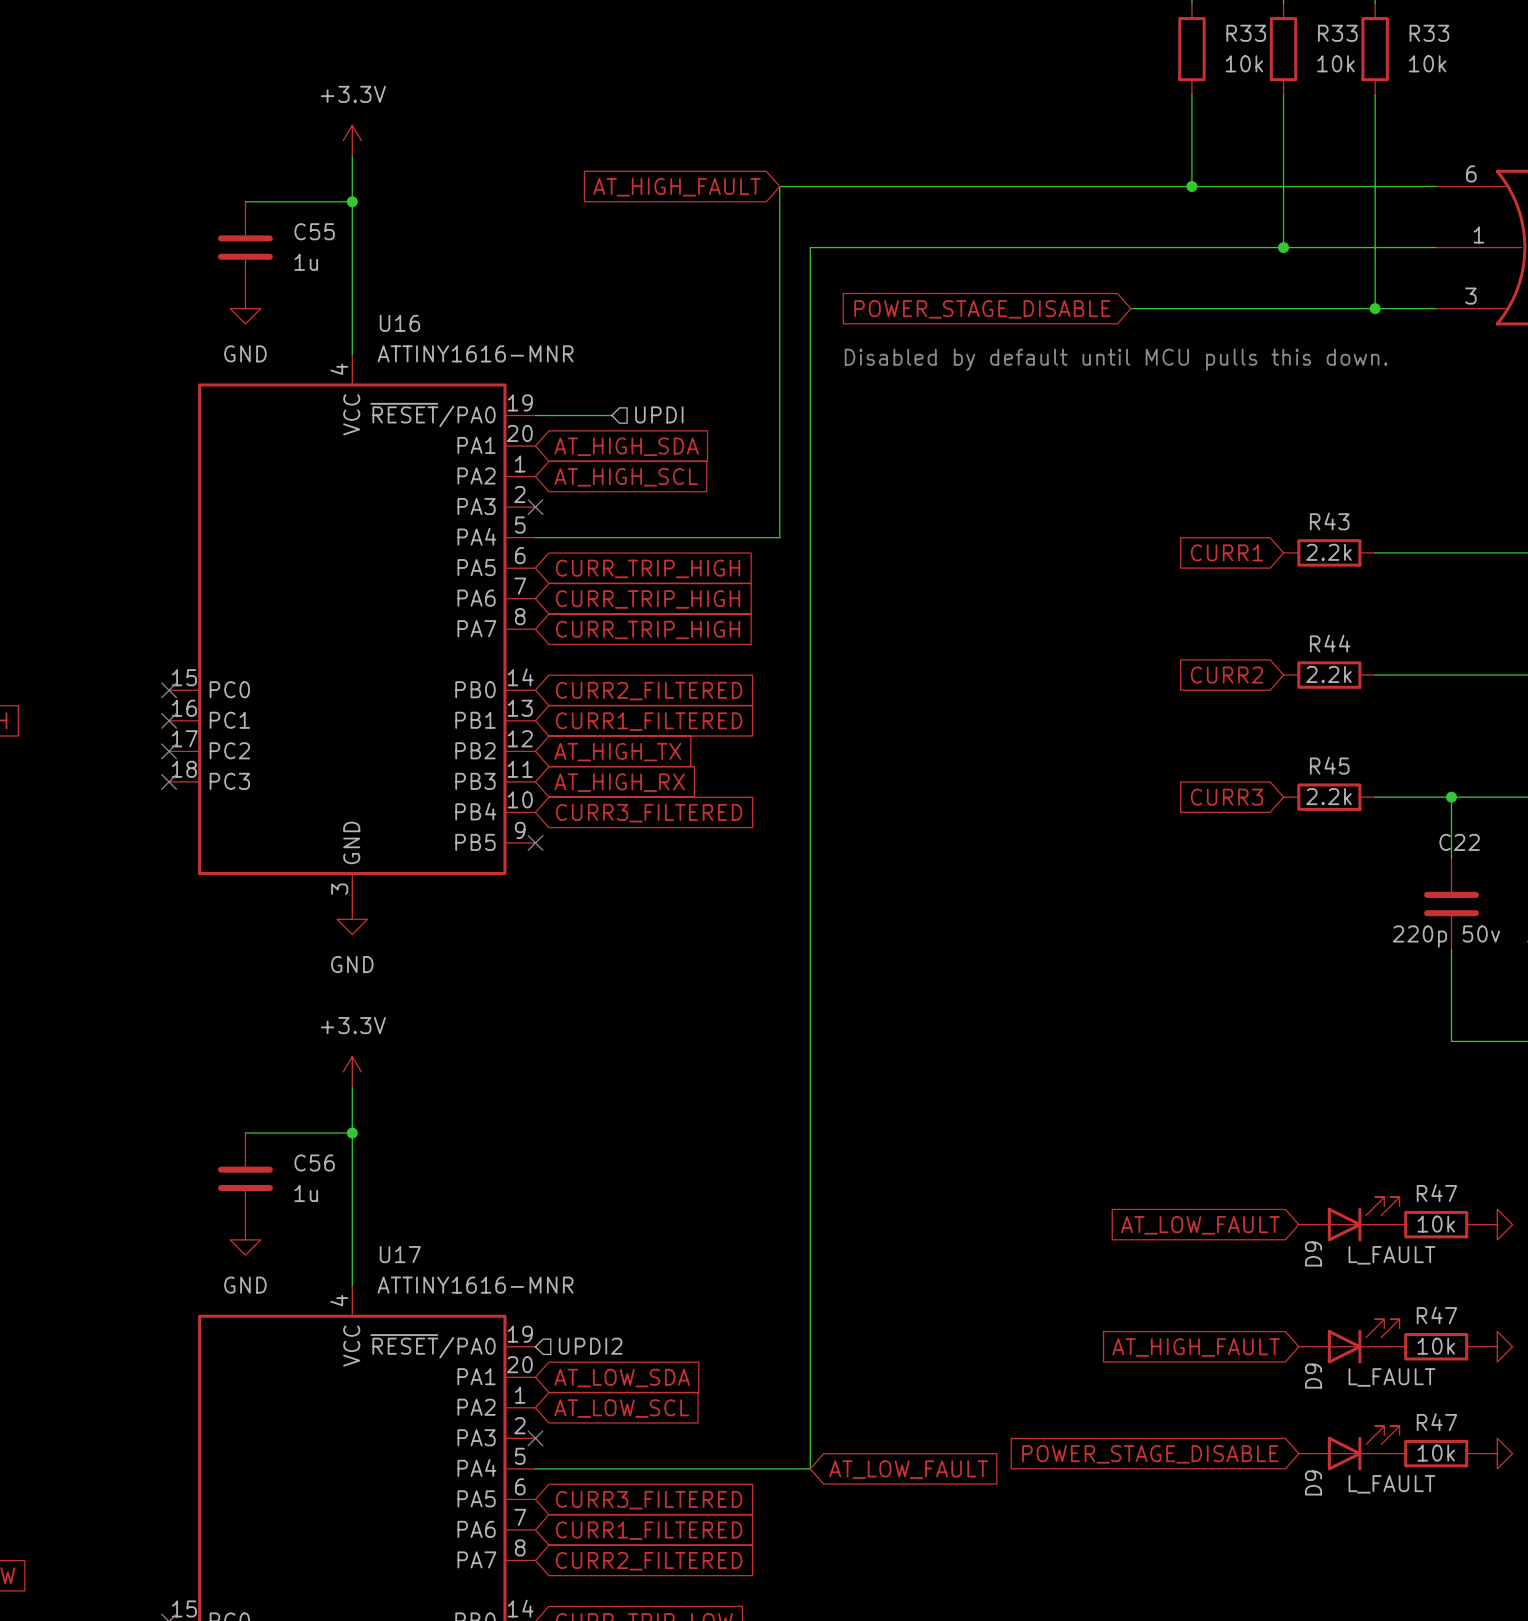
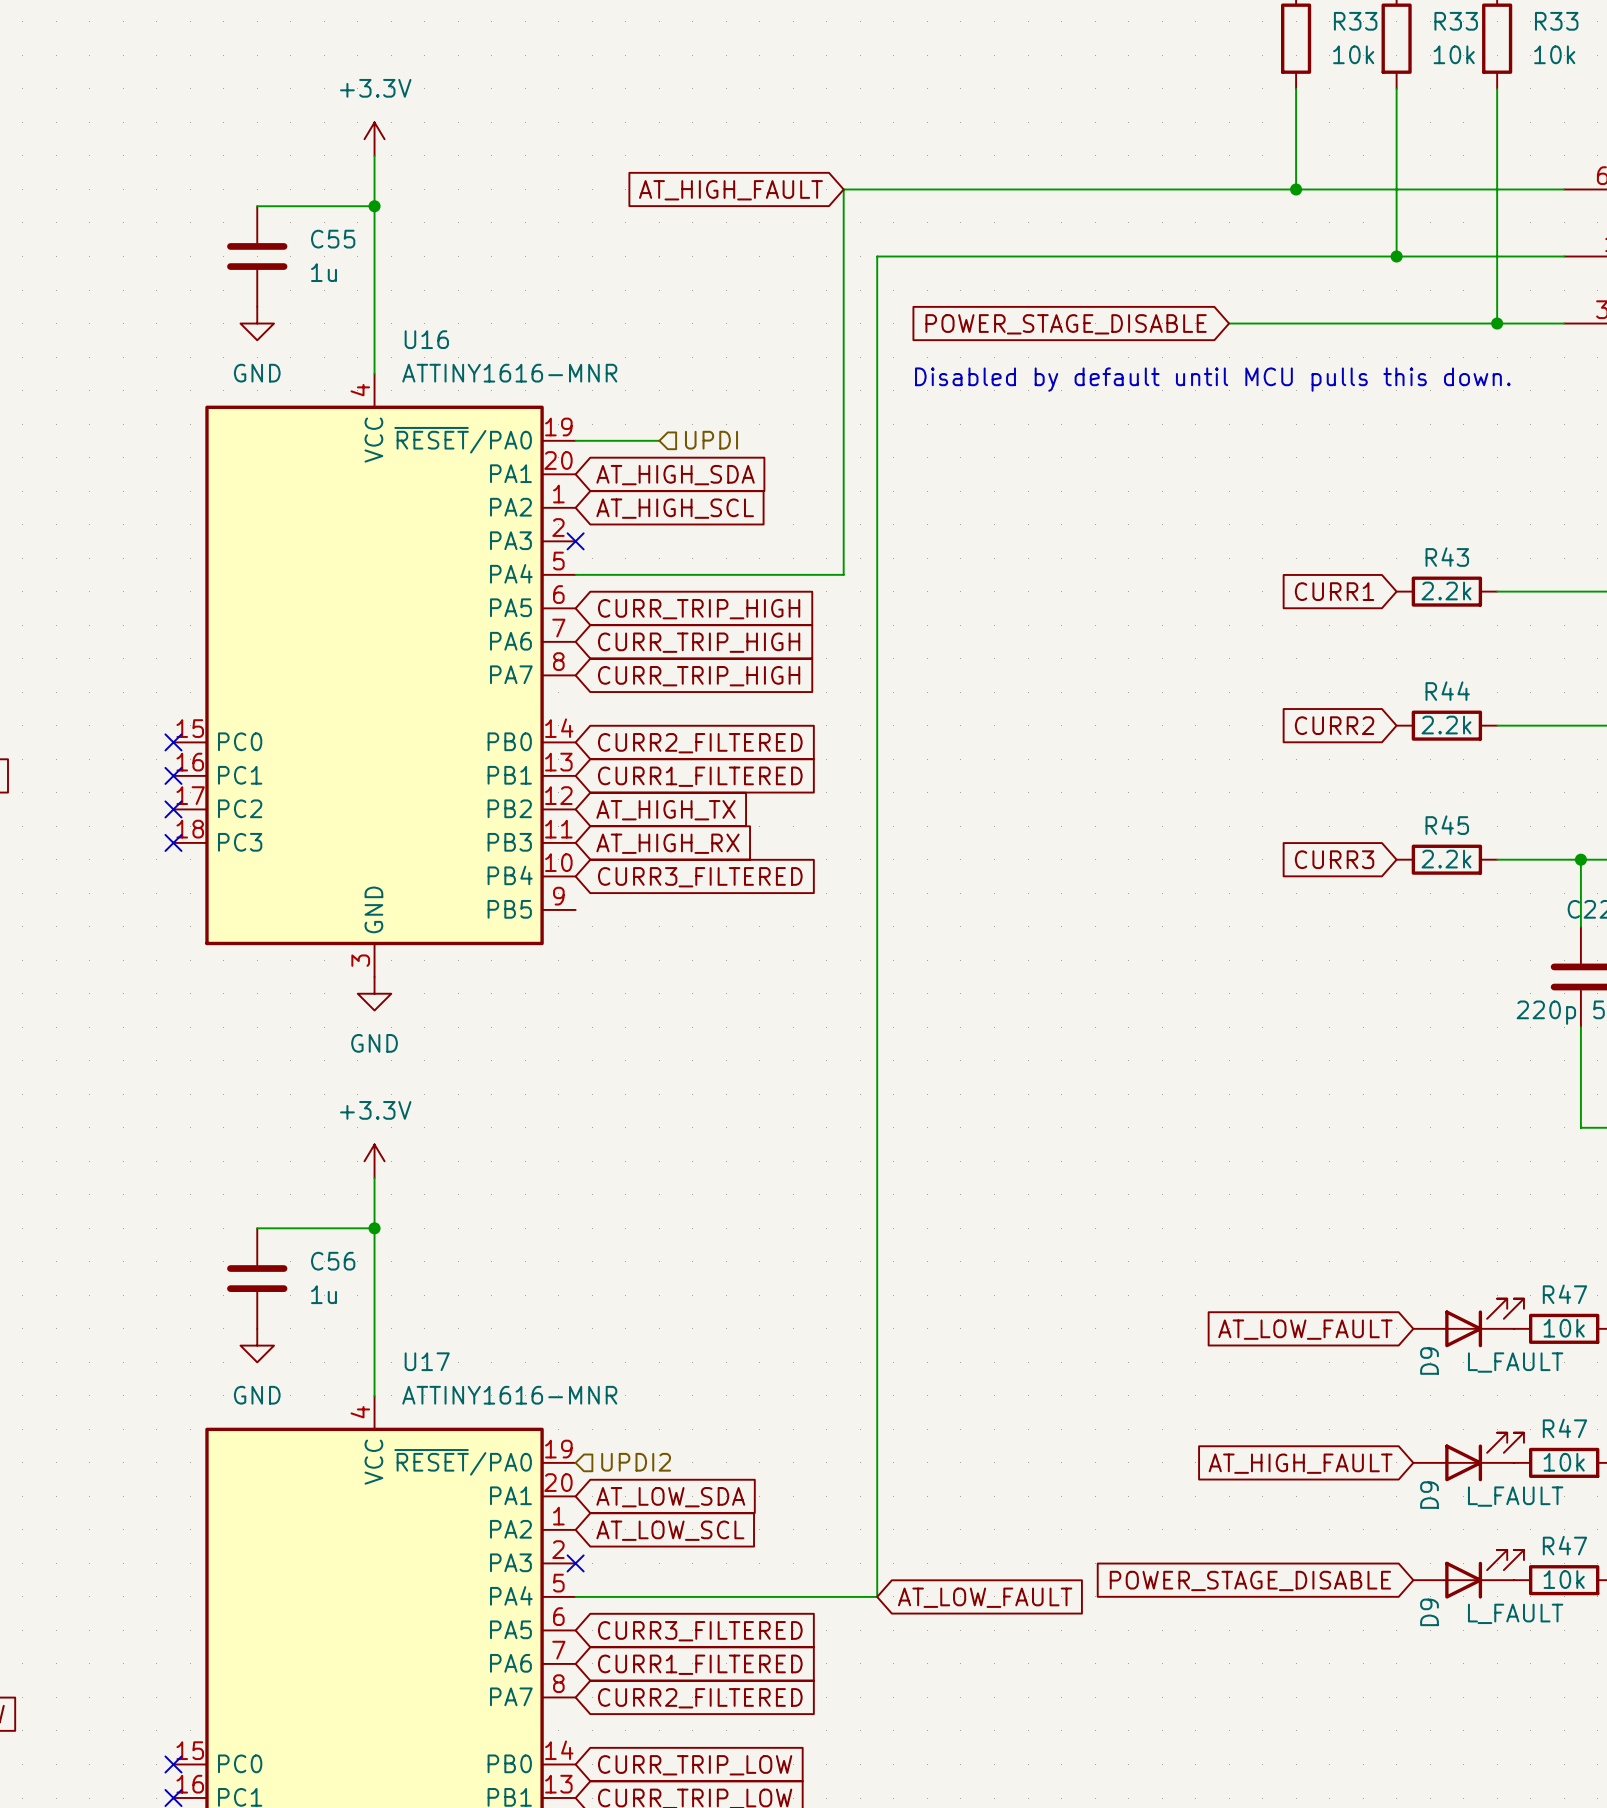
no-connect mark: (535, 842) -> none

